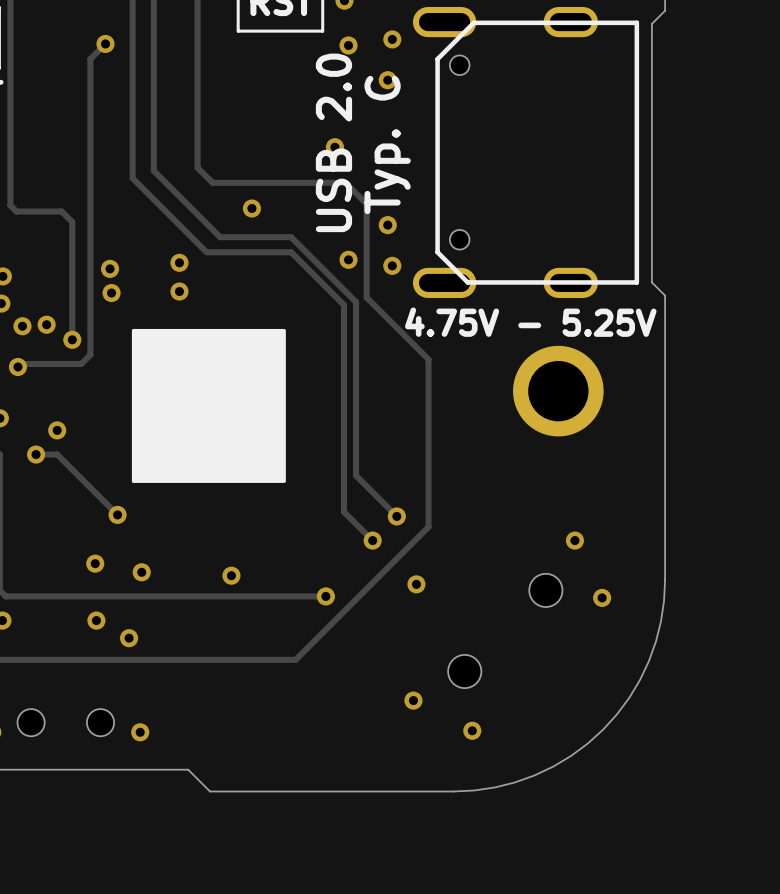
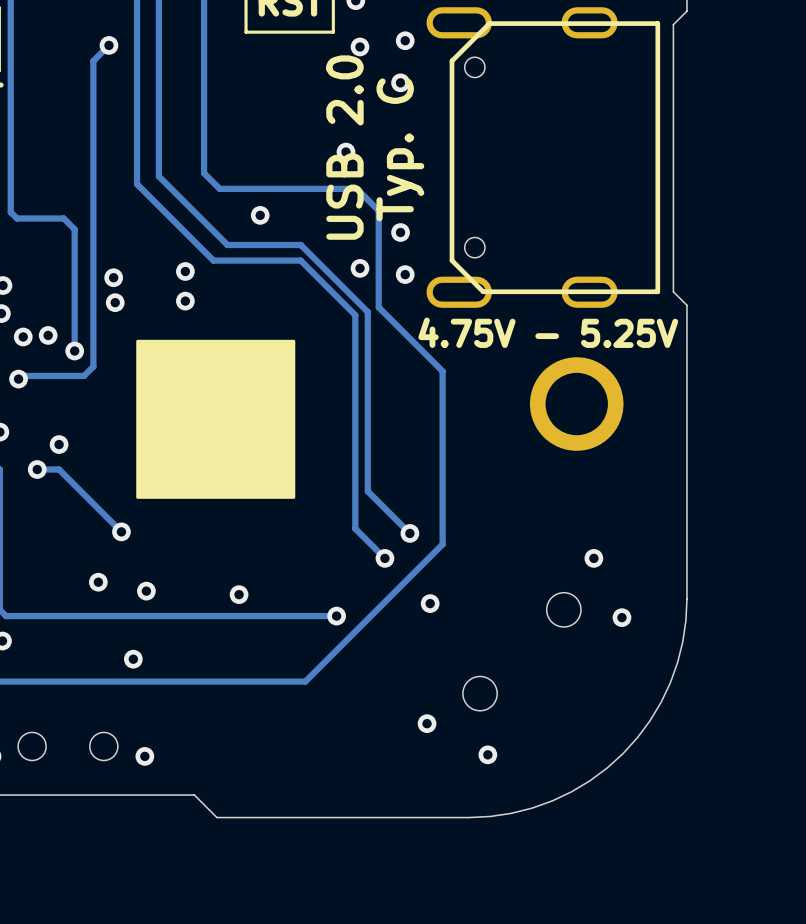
via: (96, 620) -> none

